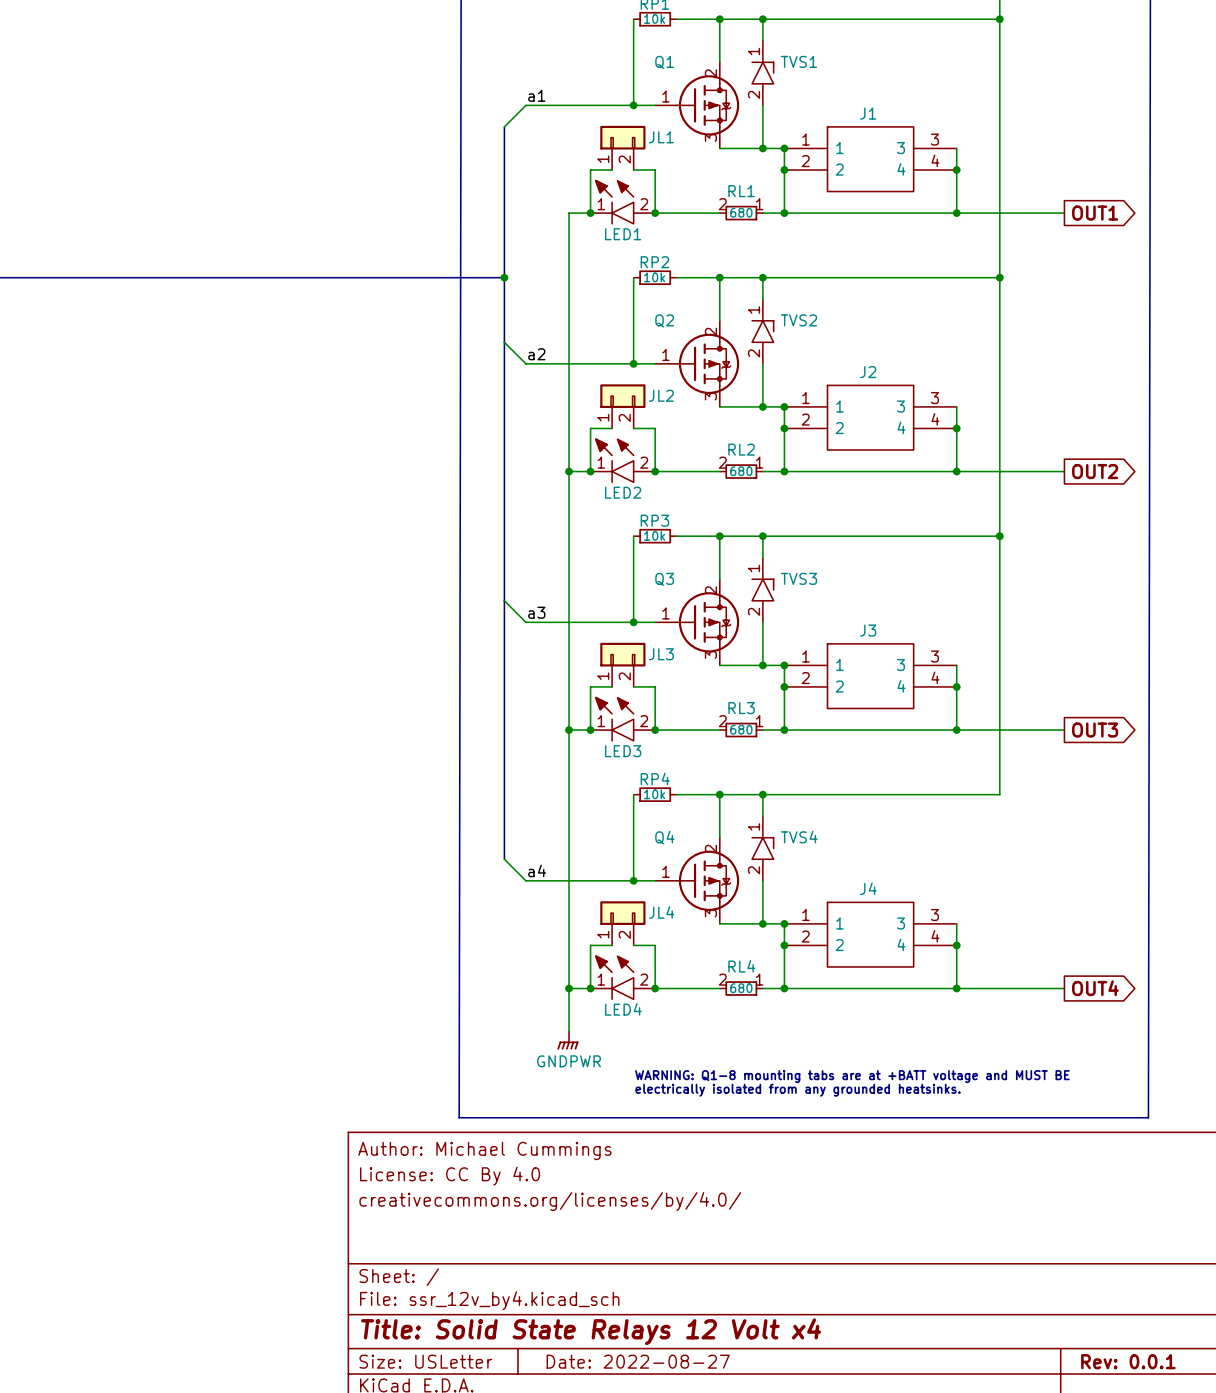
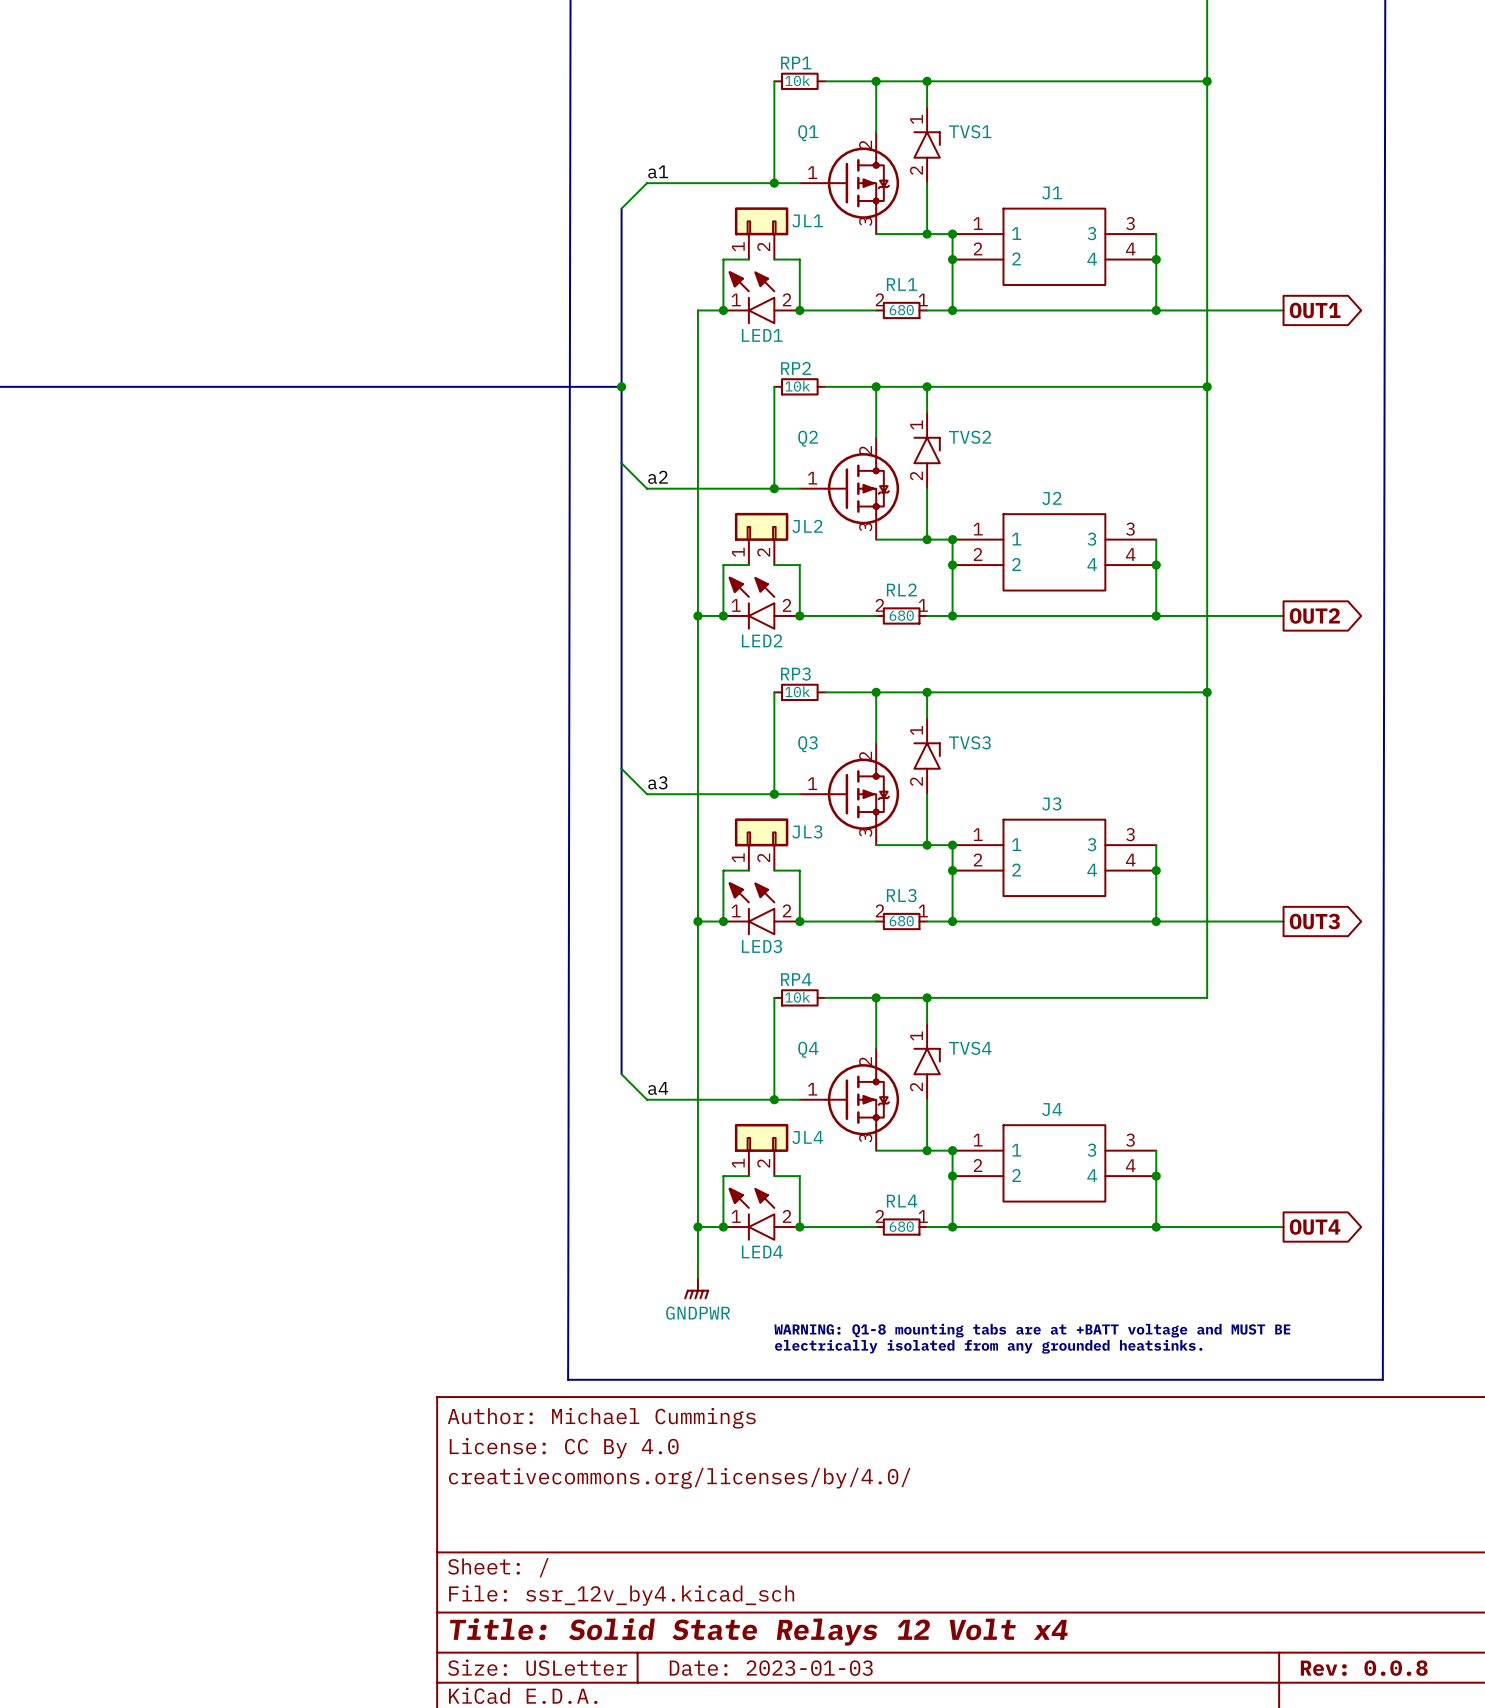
title block: Date: 2022-08-27 (638, 1361) -> Date: 2023-01-03 (771, 1668)
title block: Rev: 0.0.1 (1128, 1361) -> Rev: 0.0.8 (1364, 1668)

